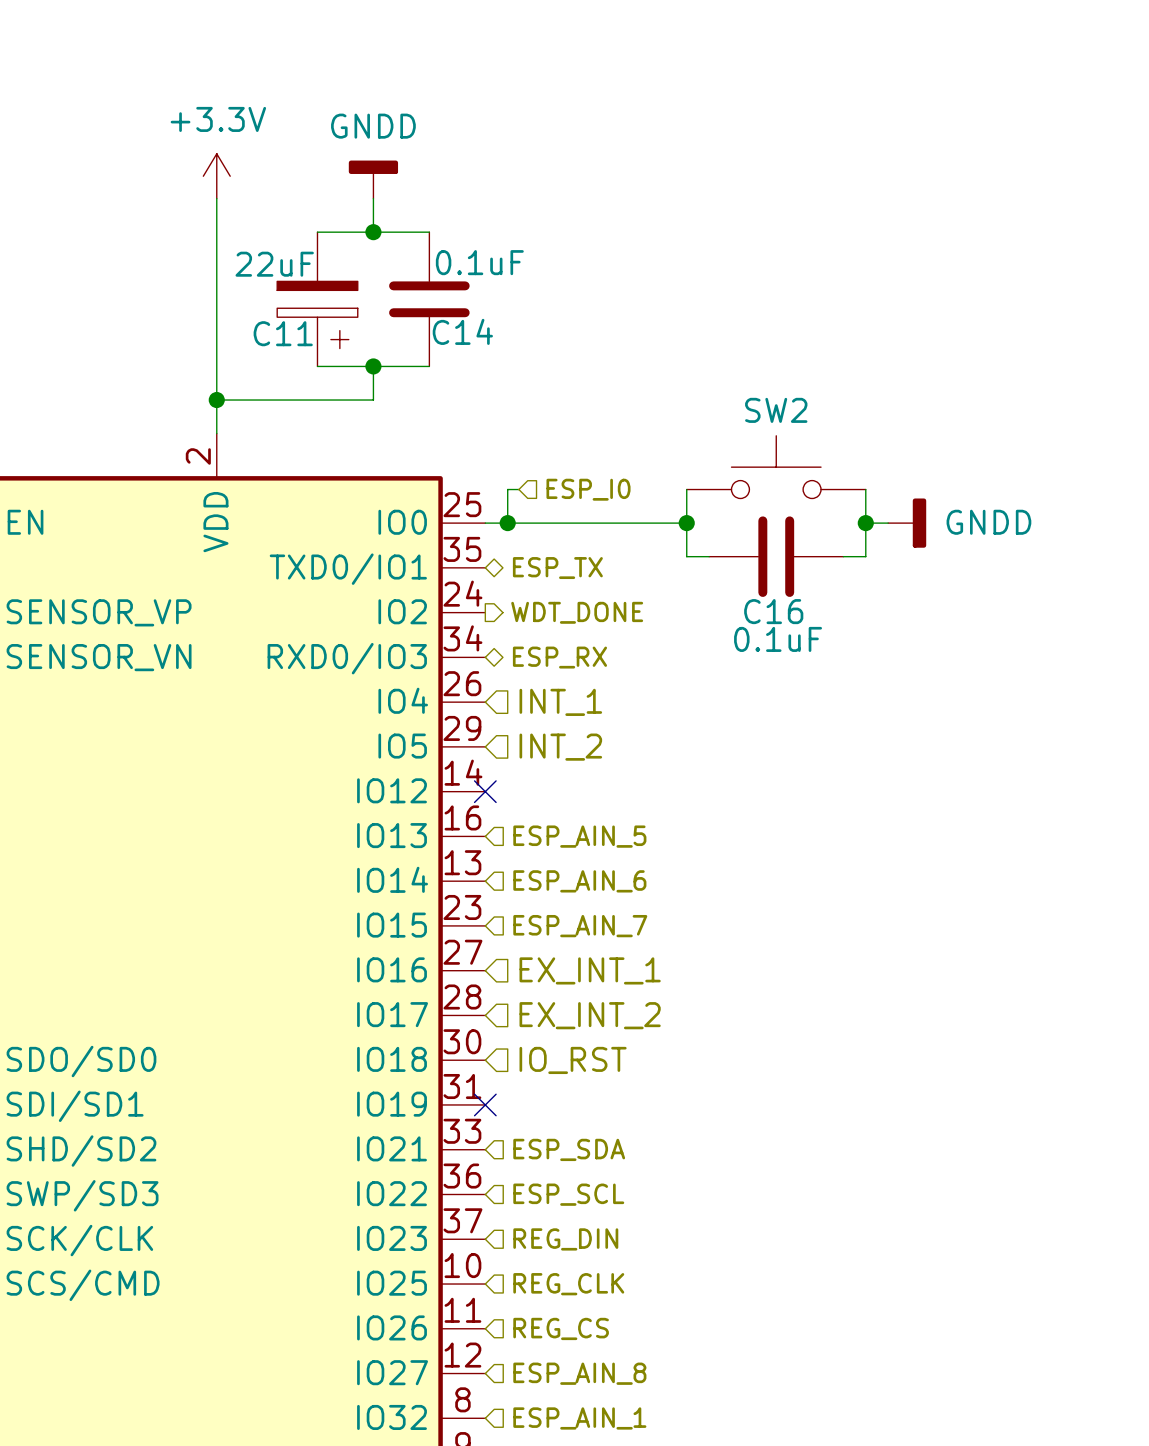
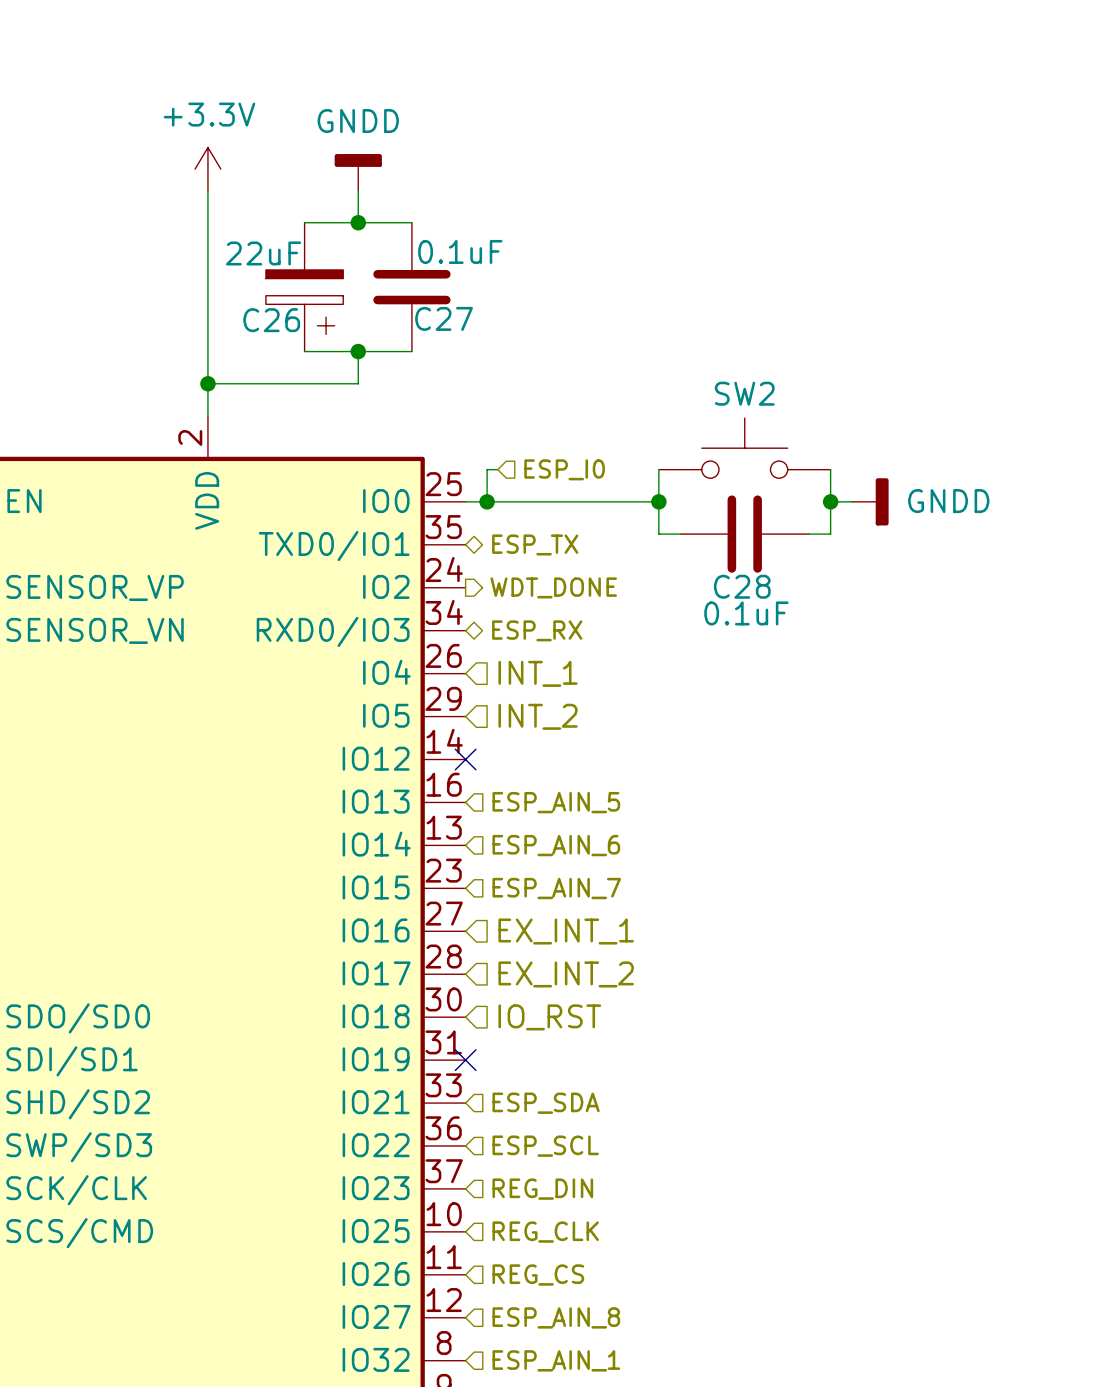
C14 name: C14 (462, 331) -> C27 (444, 318)
C11 name: C11 (283, 333) -> C26 (271, 320)
C16 name: C16 (773, 611) -> C28 (742, 586)

